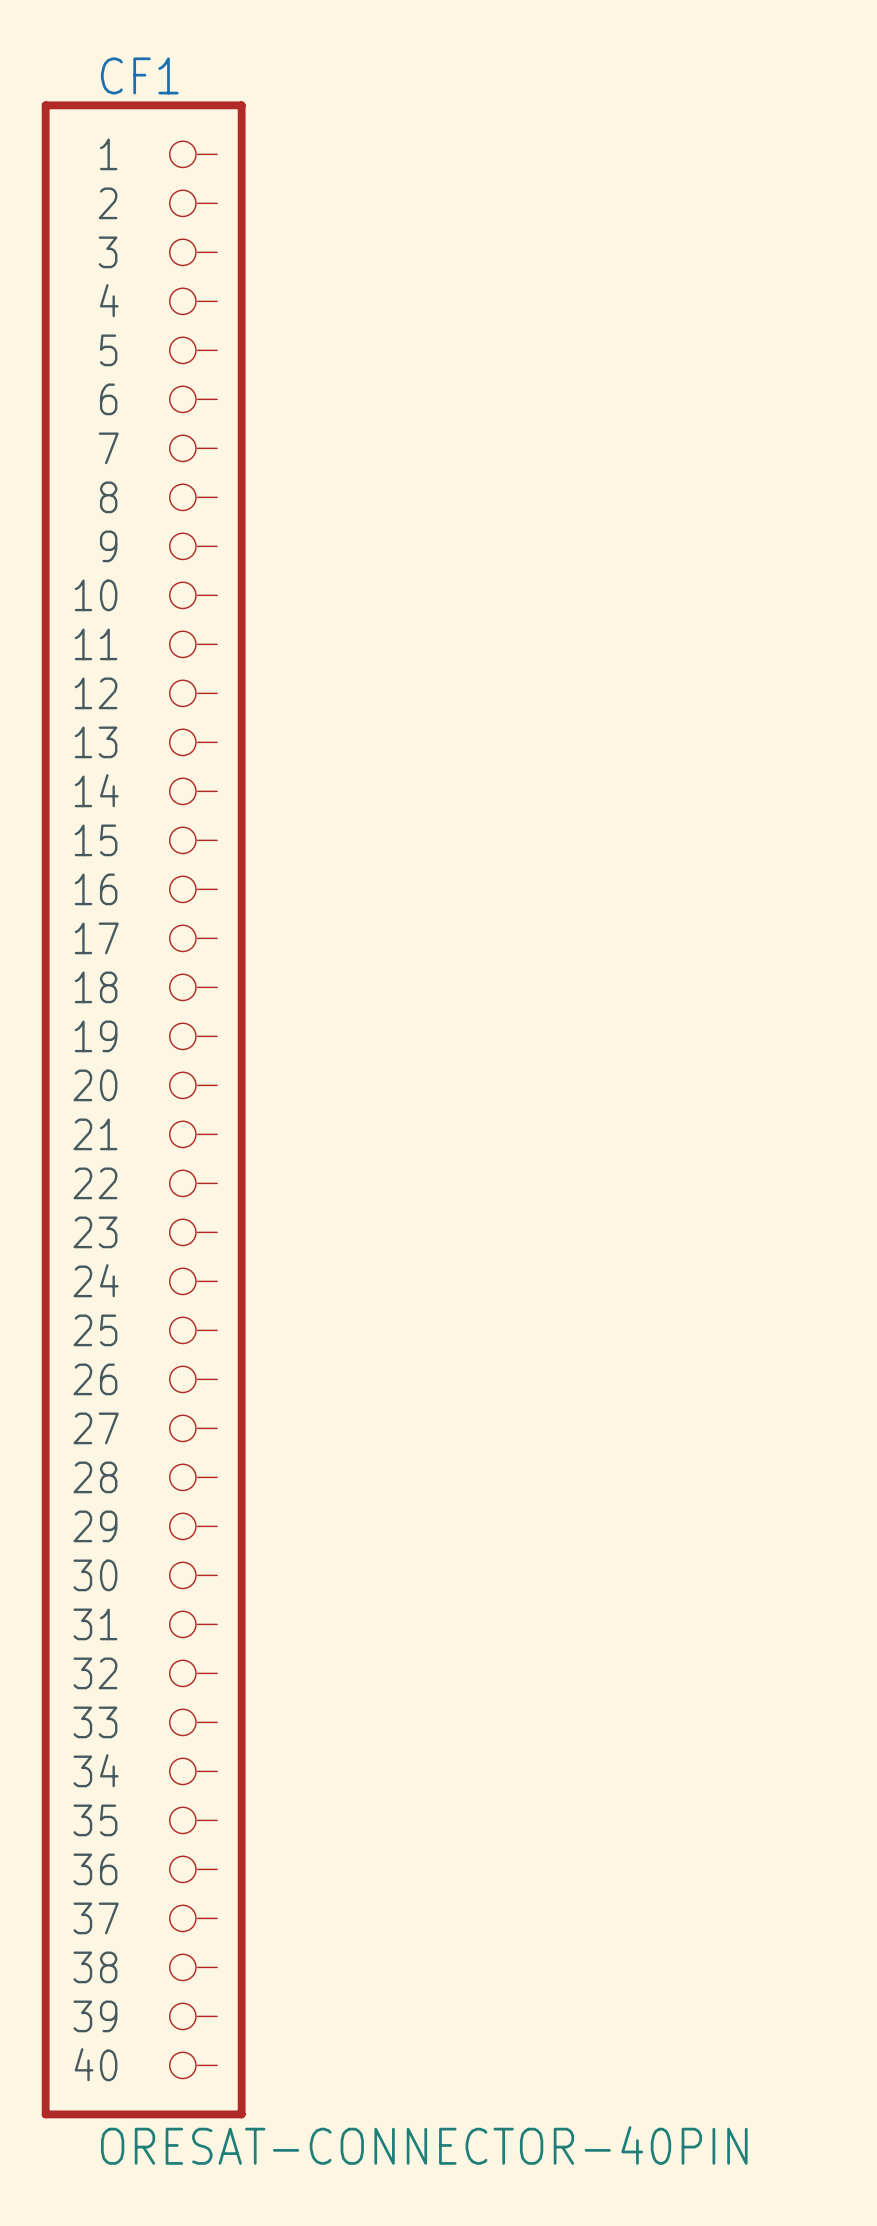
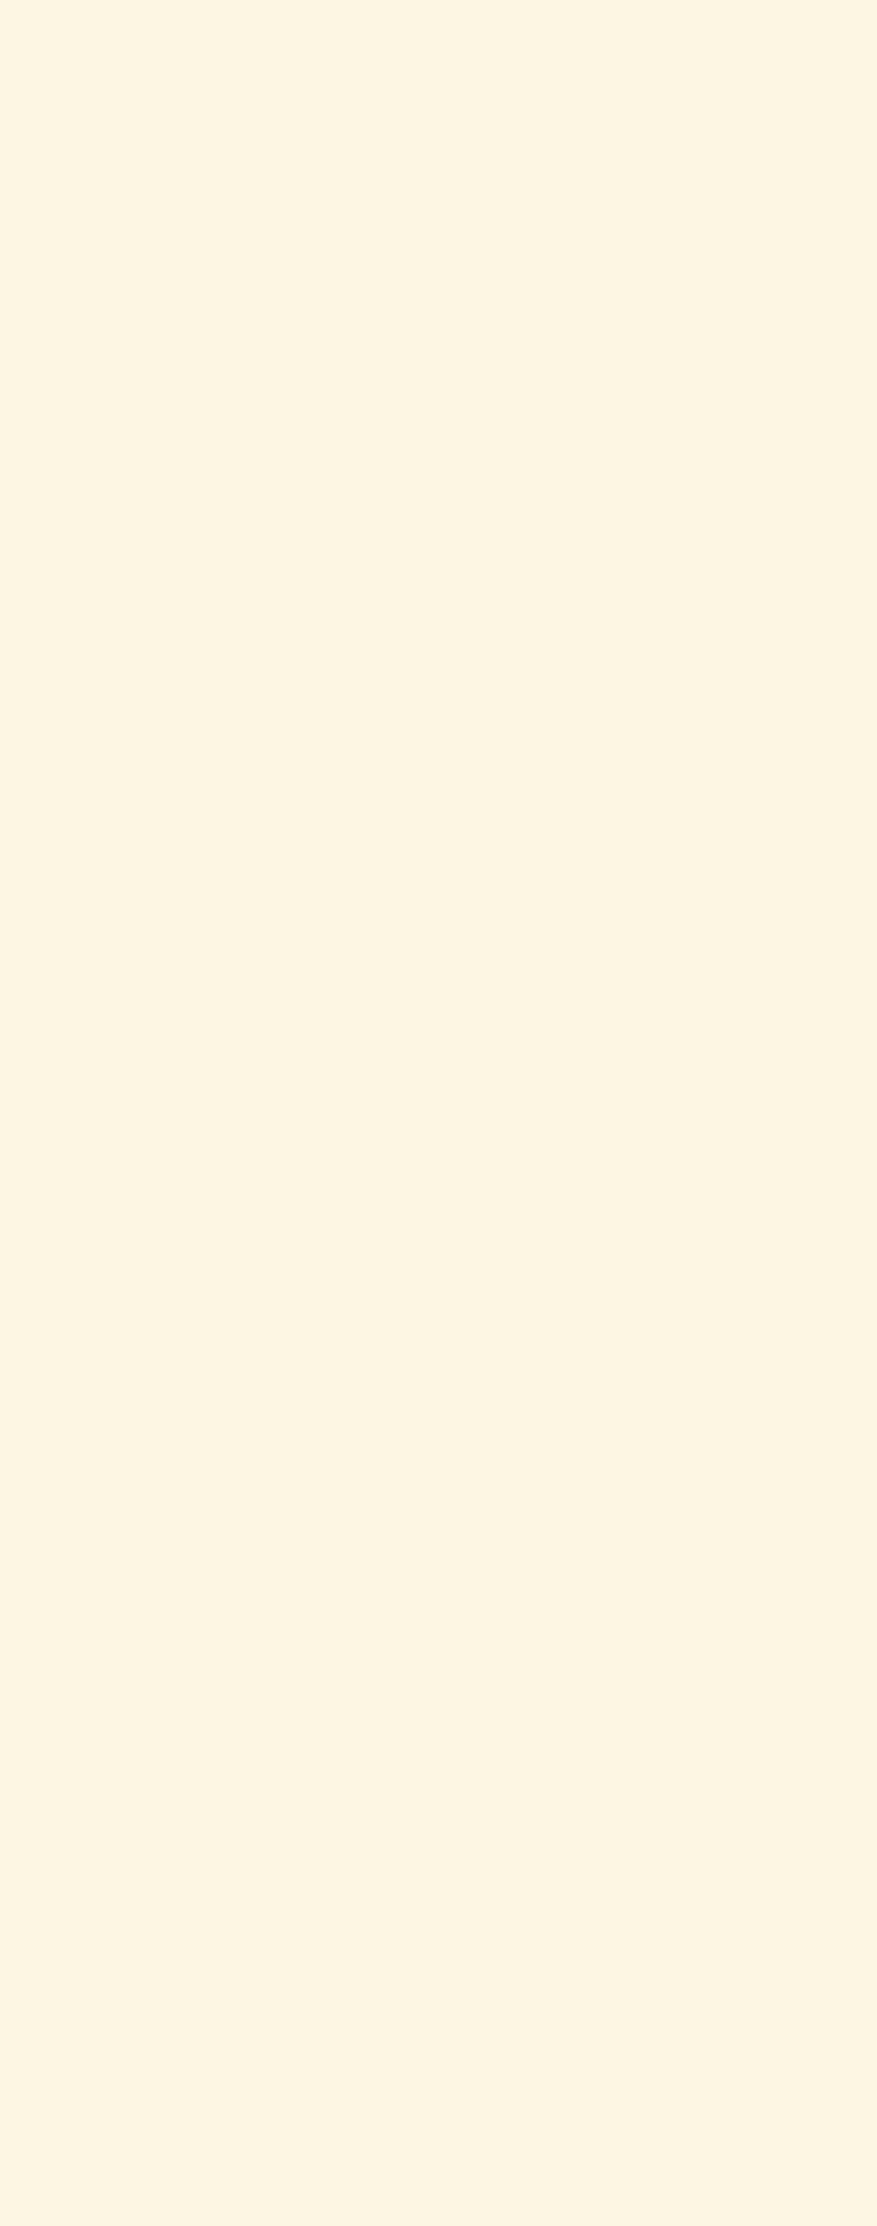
CF1: ORESAT-CONNECTOR-40PIN (143, 1109) -> none

